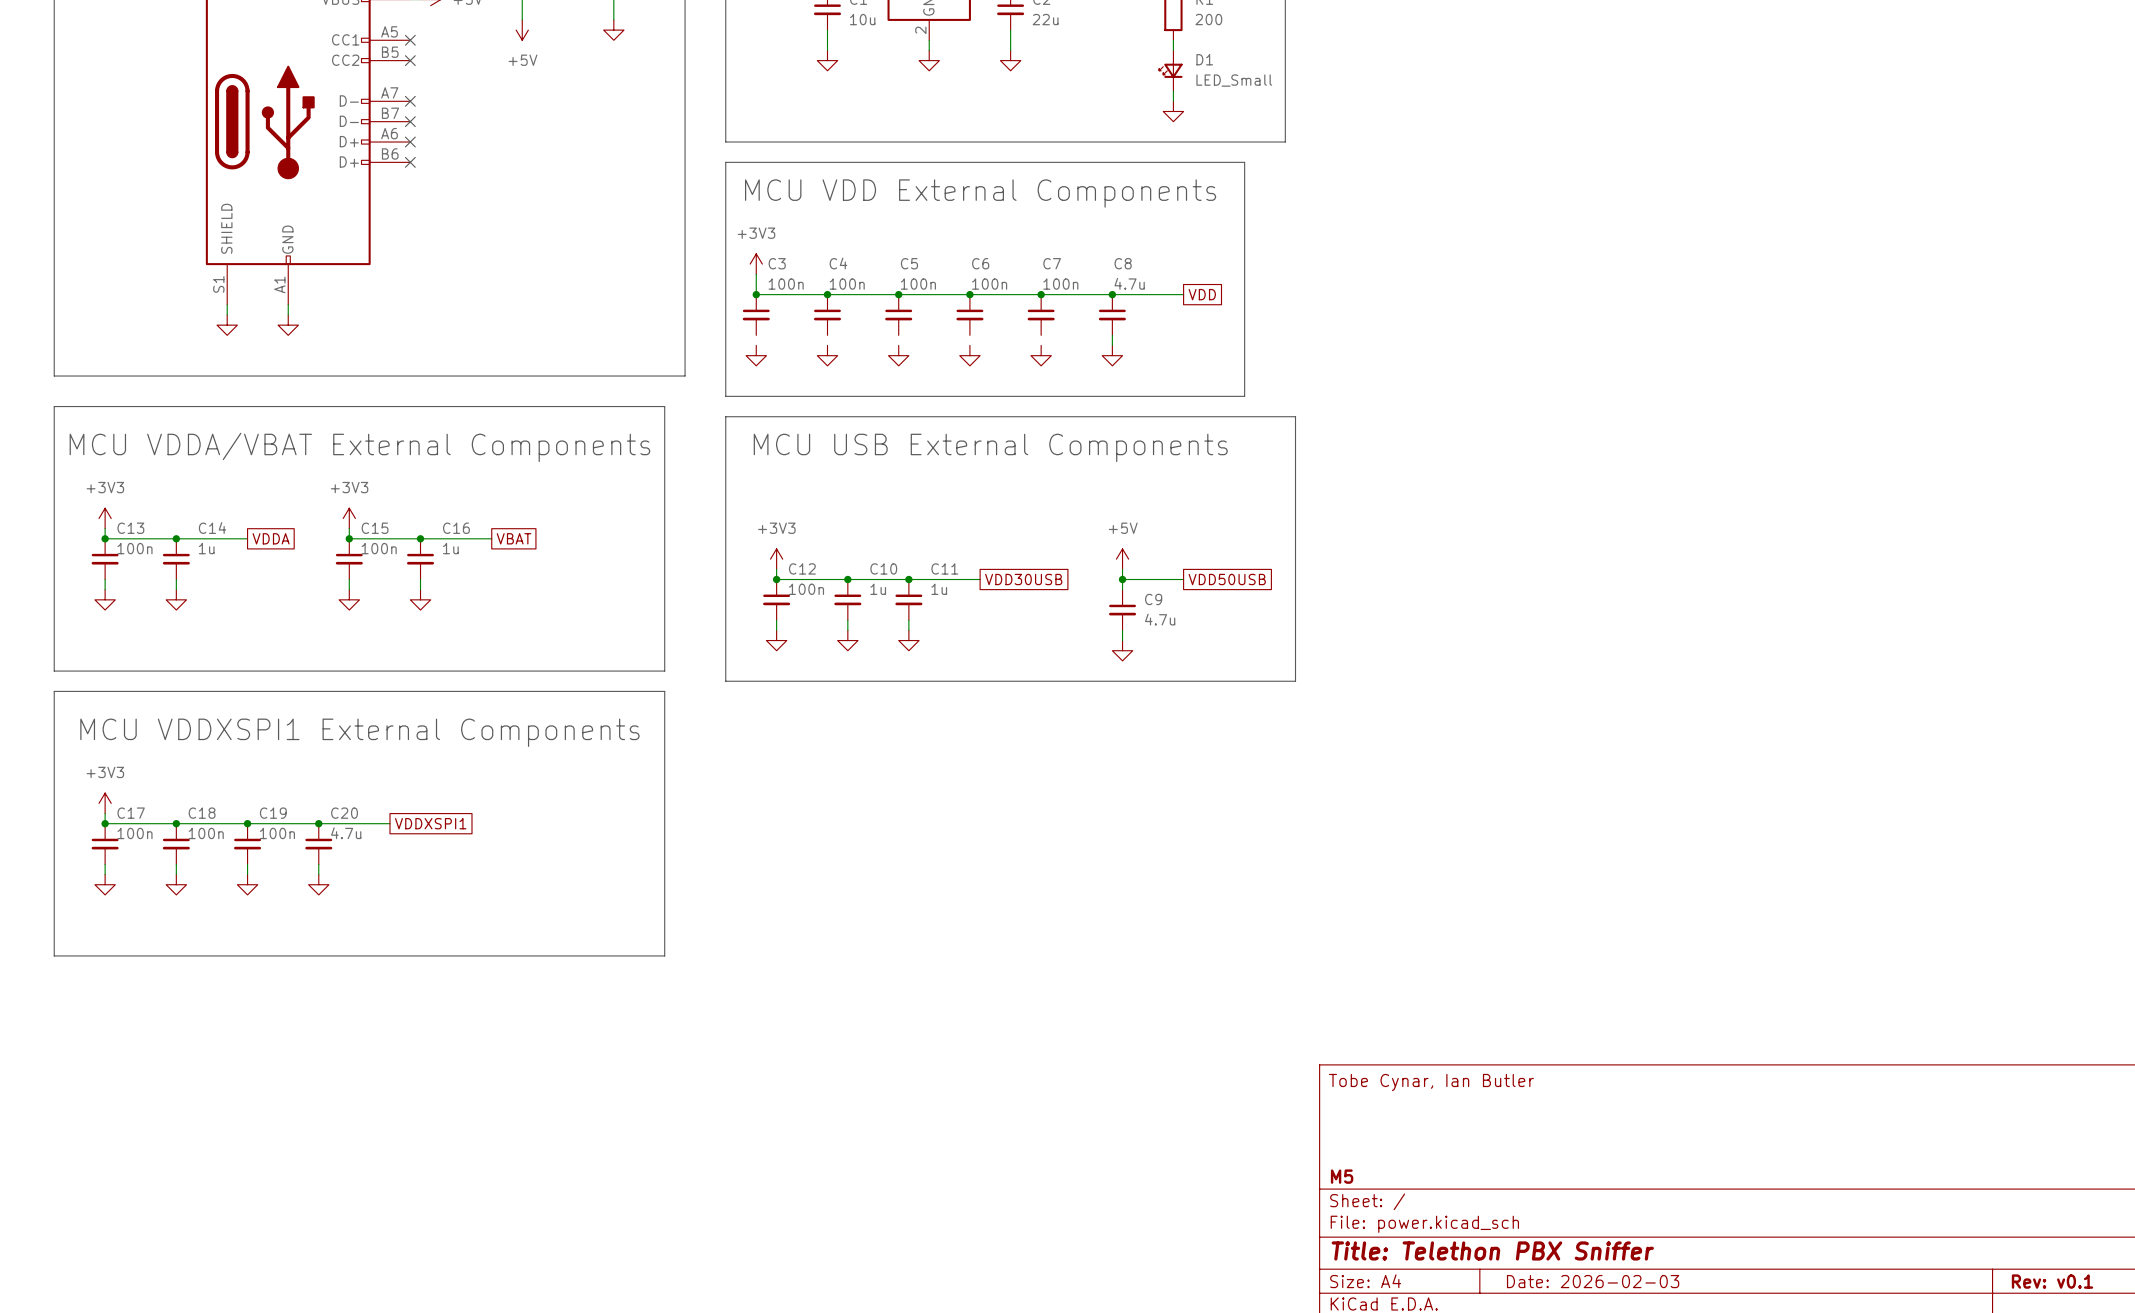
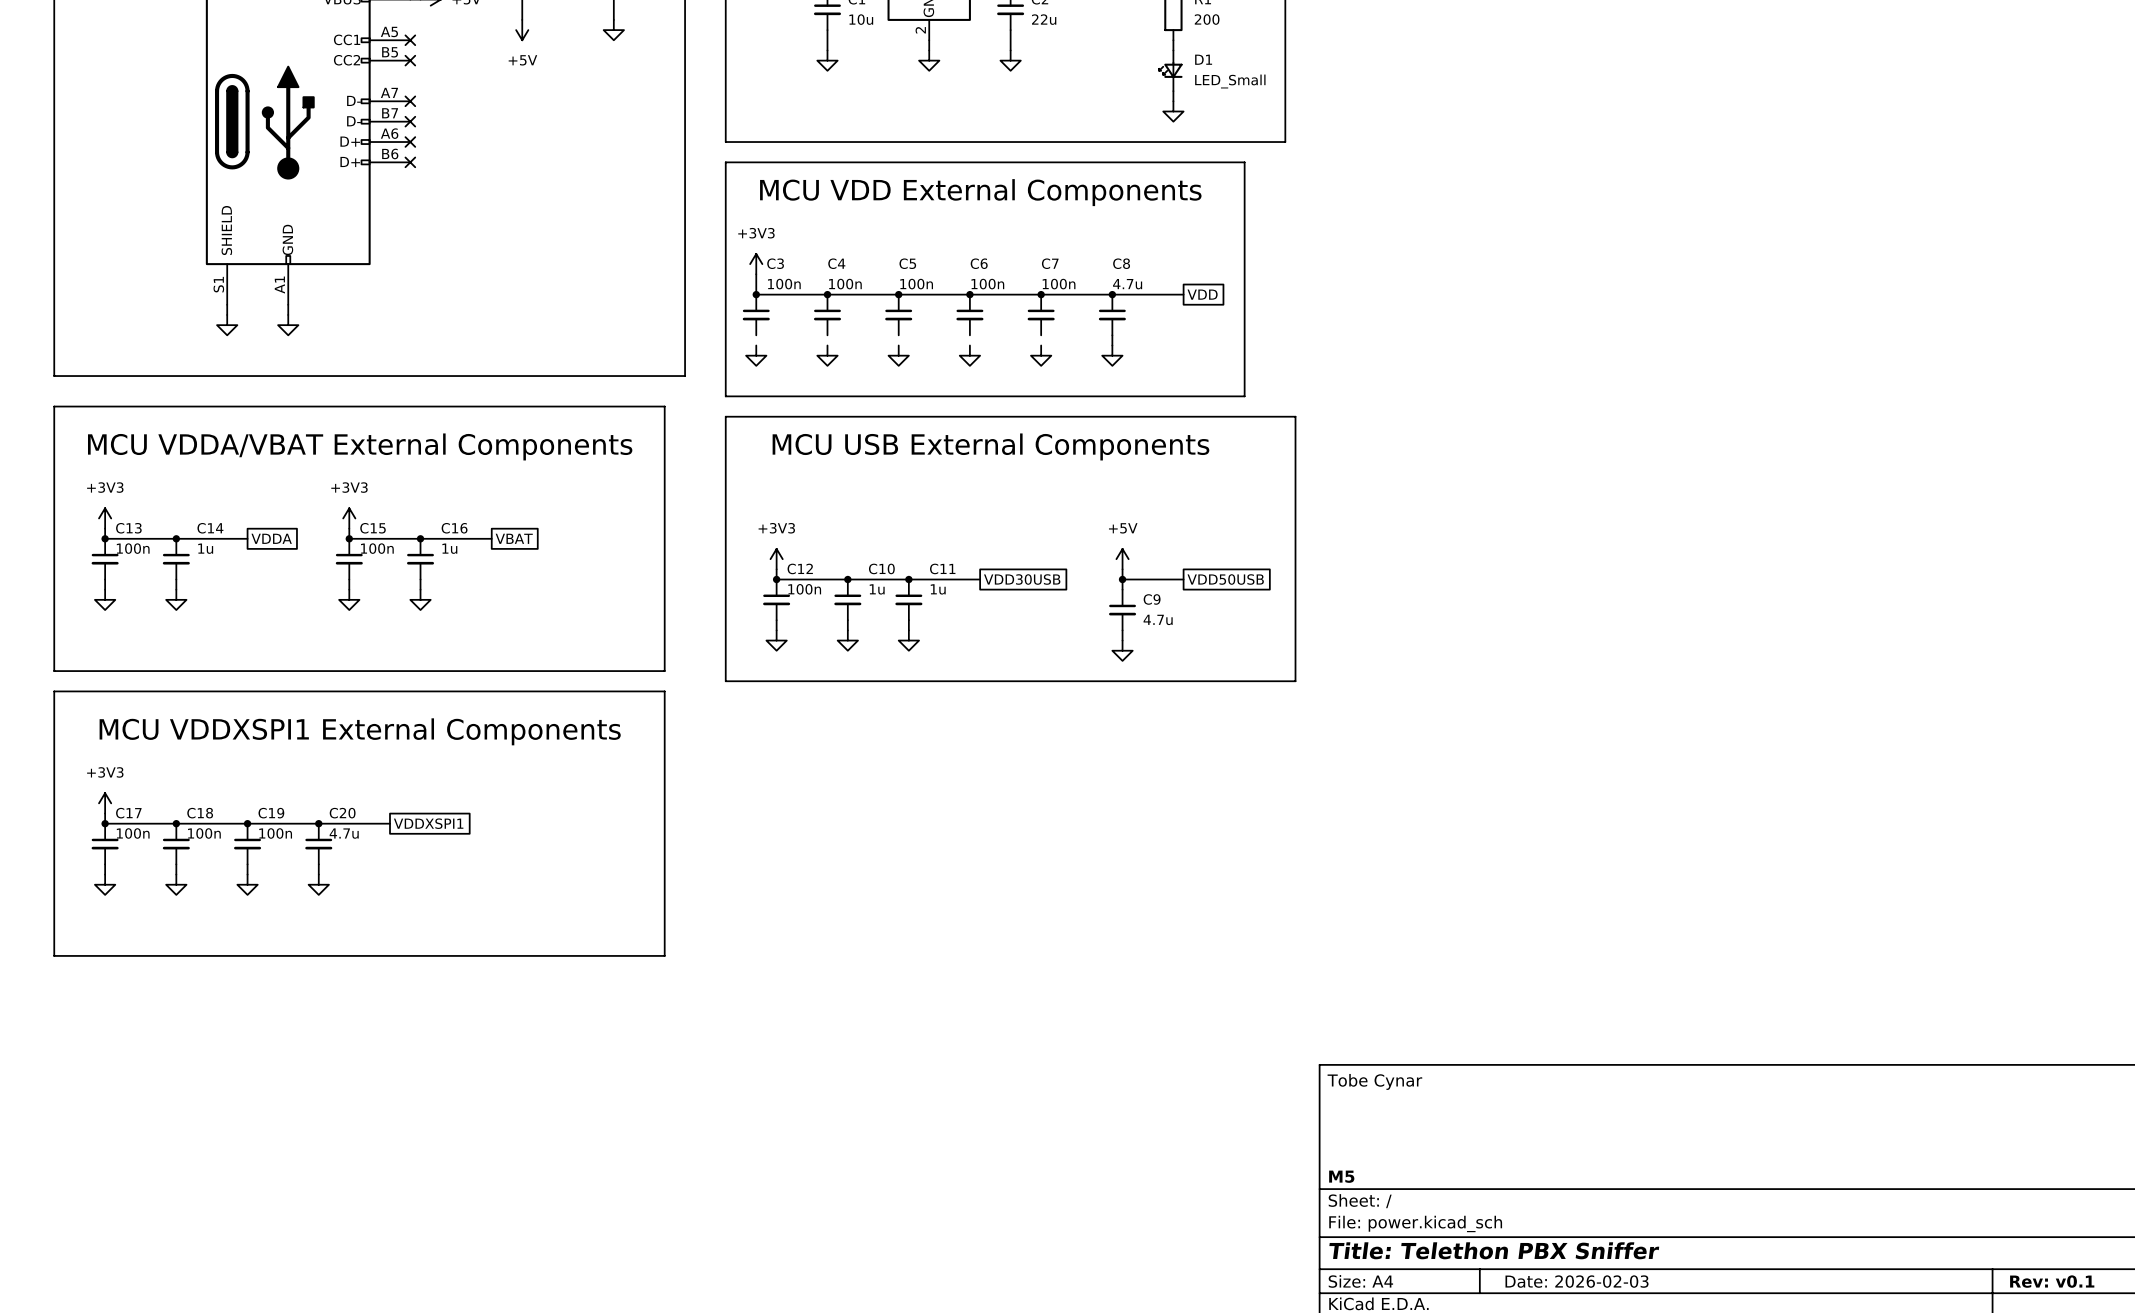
title block: Tobe Cynar, Ian Butler (1431, 1082) -> Tobe Cynar (1374, 1081)

